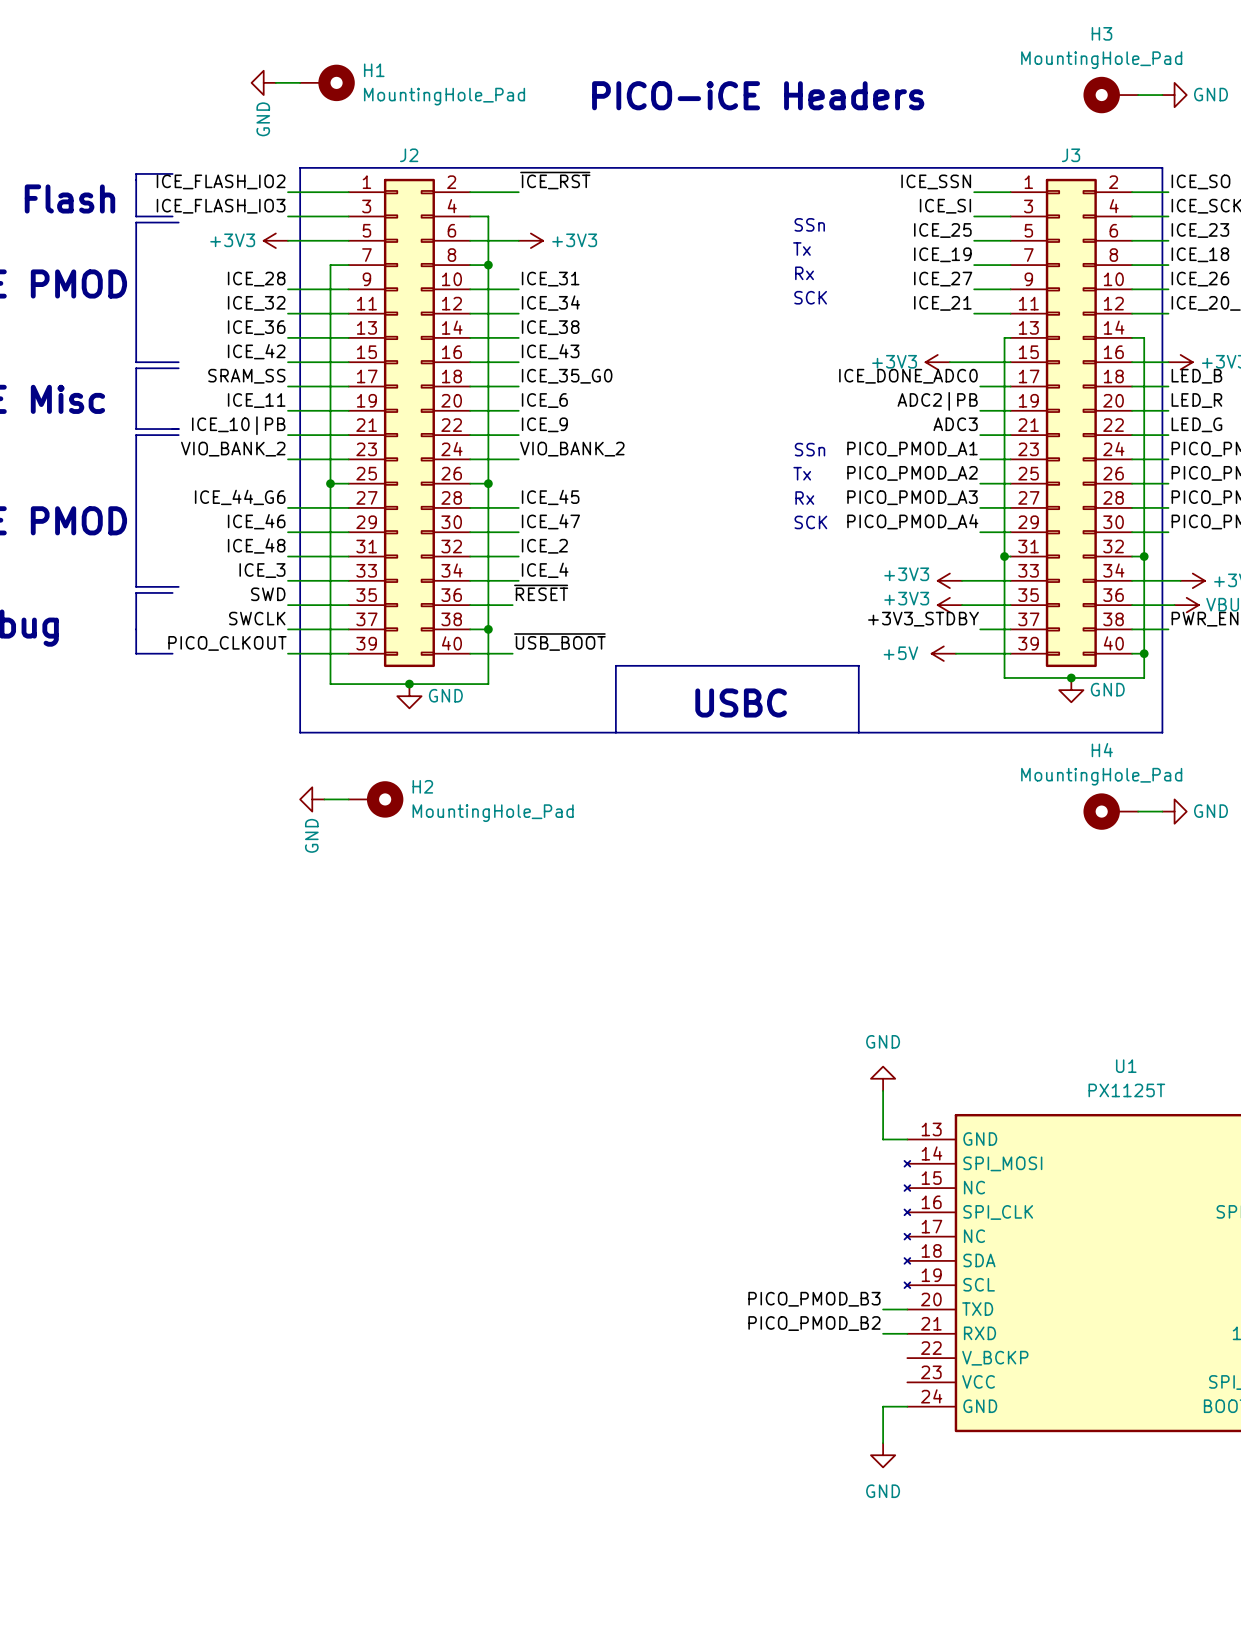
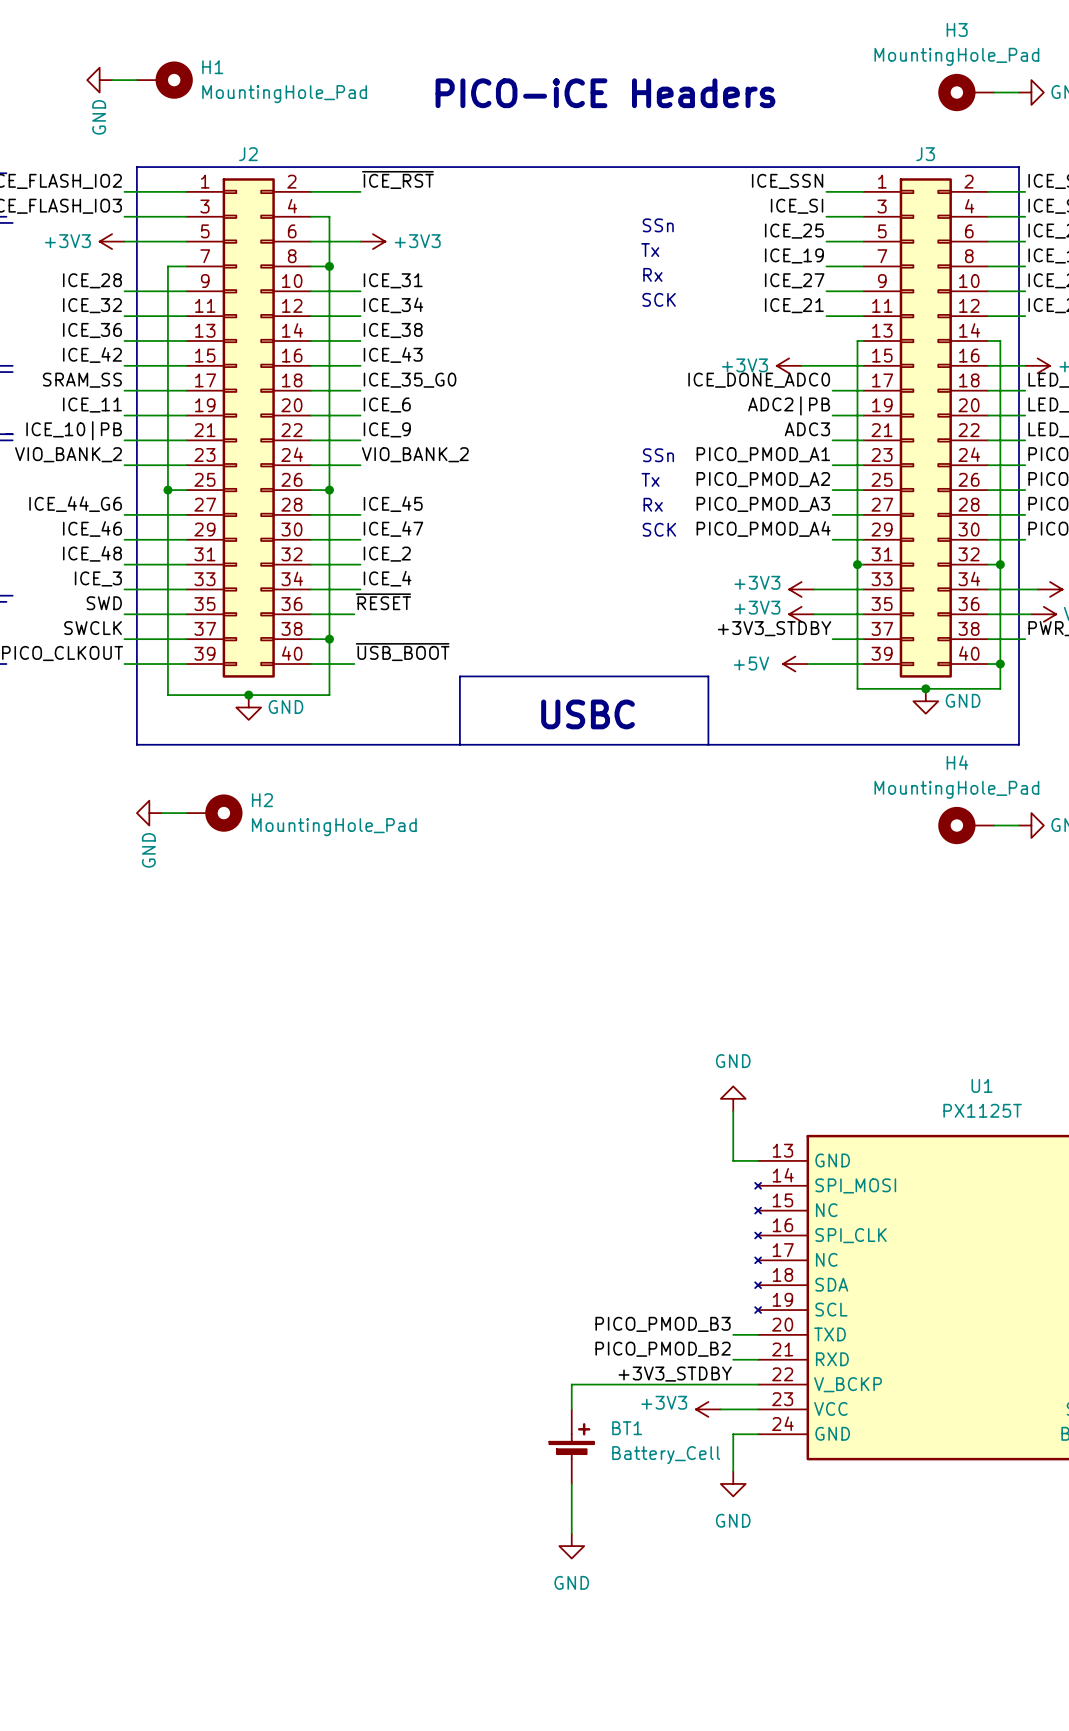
label: none -> +3V3_STDBY (675, 1374)
wire: none -> (758, 1384) (571, 1384) (571, 1409)
power symbol: none -> +3V3 (708, 1409)
wire: none -> (720, 1409) (758, 1409)
BT1: none -> Battery_Cell (571, 1446)
wire: none -> (571, 1483) (571, 1533)
power symbol: none -> GND (571, 1546)

